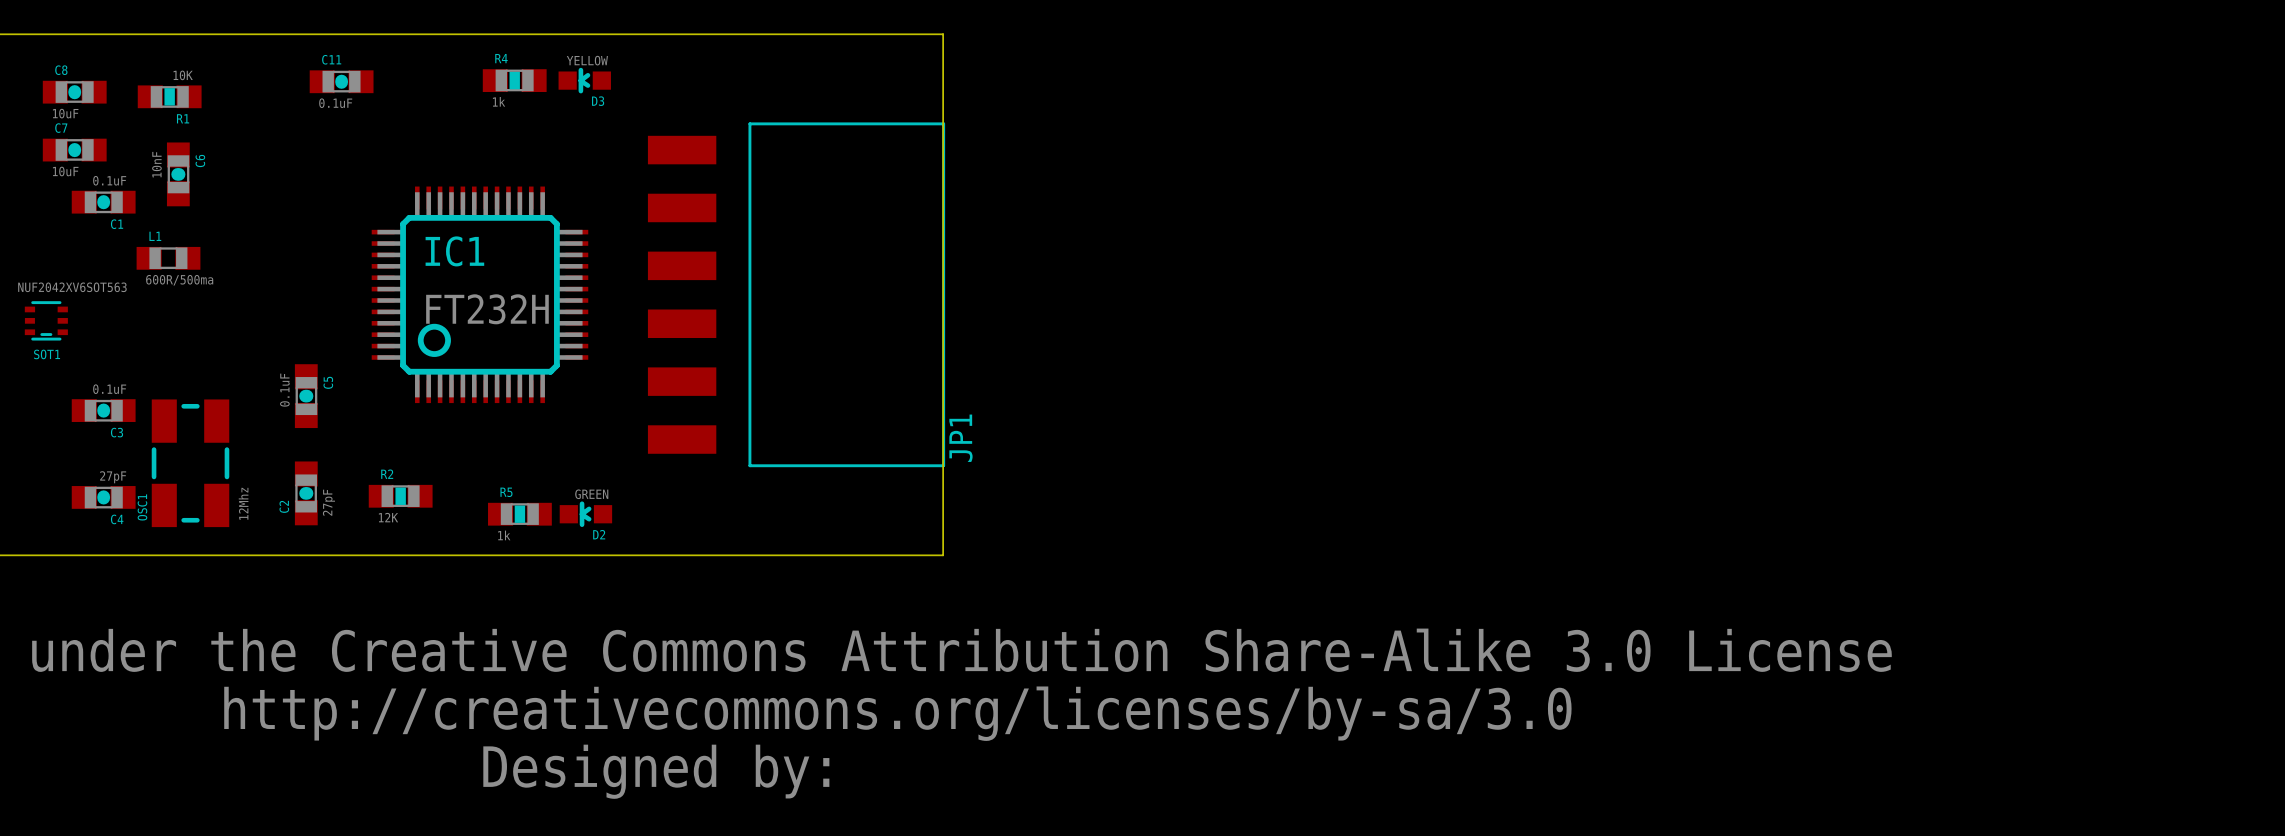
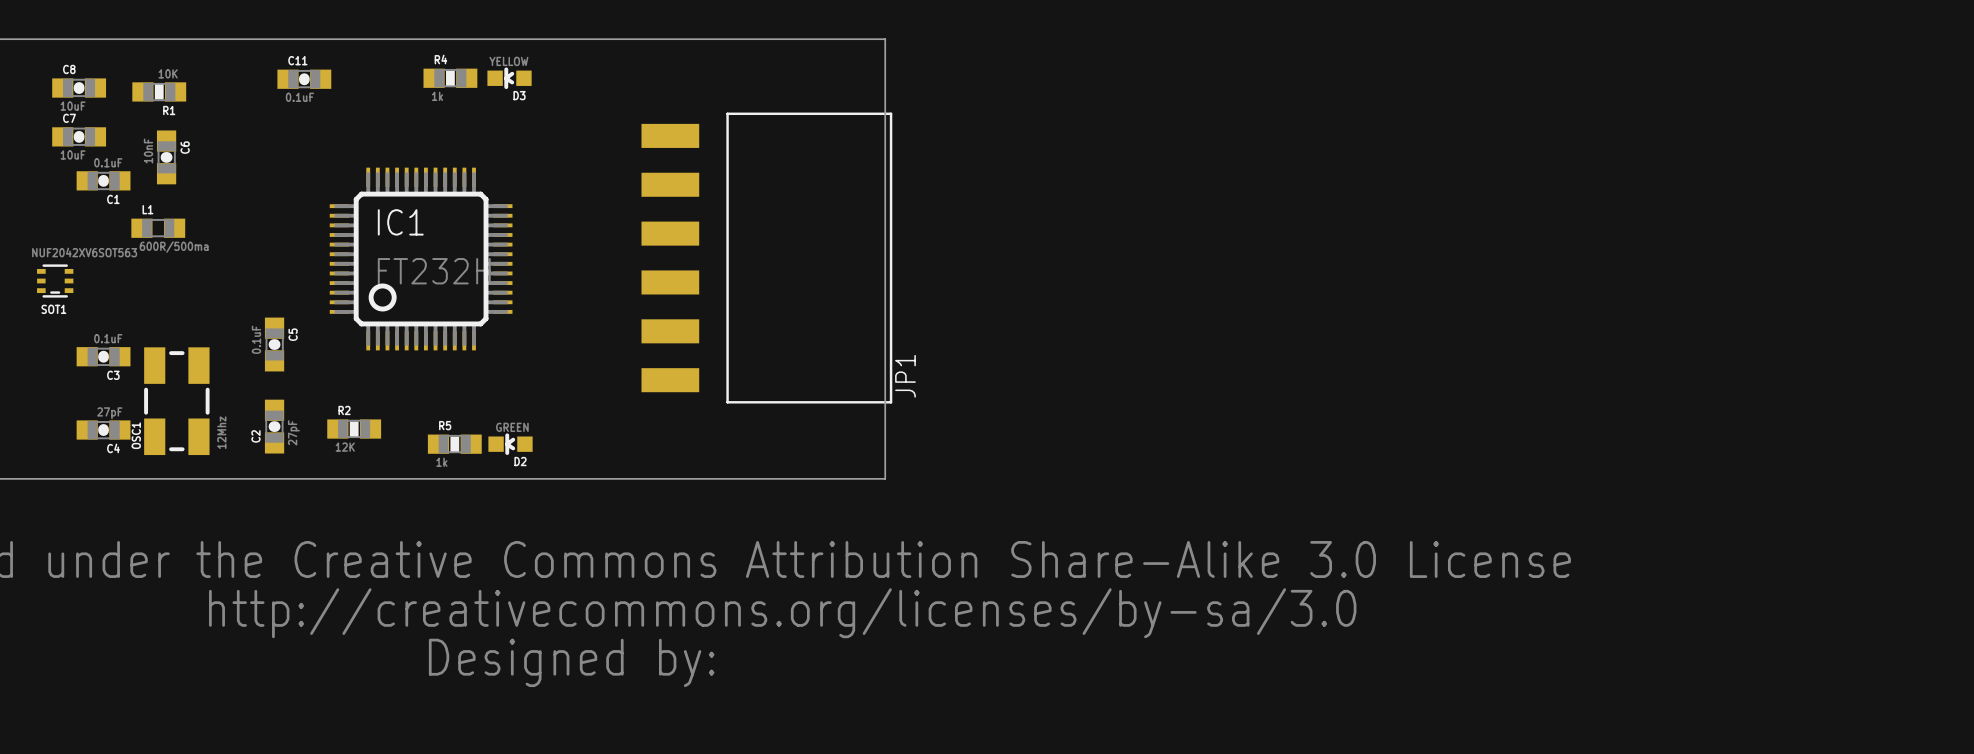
board edge: (943, 34) (943, 555) -> (811, 39) (885, 39) (885, 478) (811, 478)
JP1 position: (796, 294) -> (766, 258)

